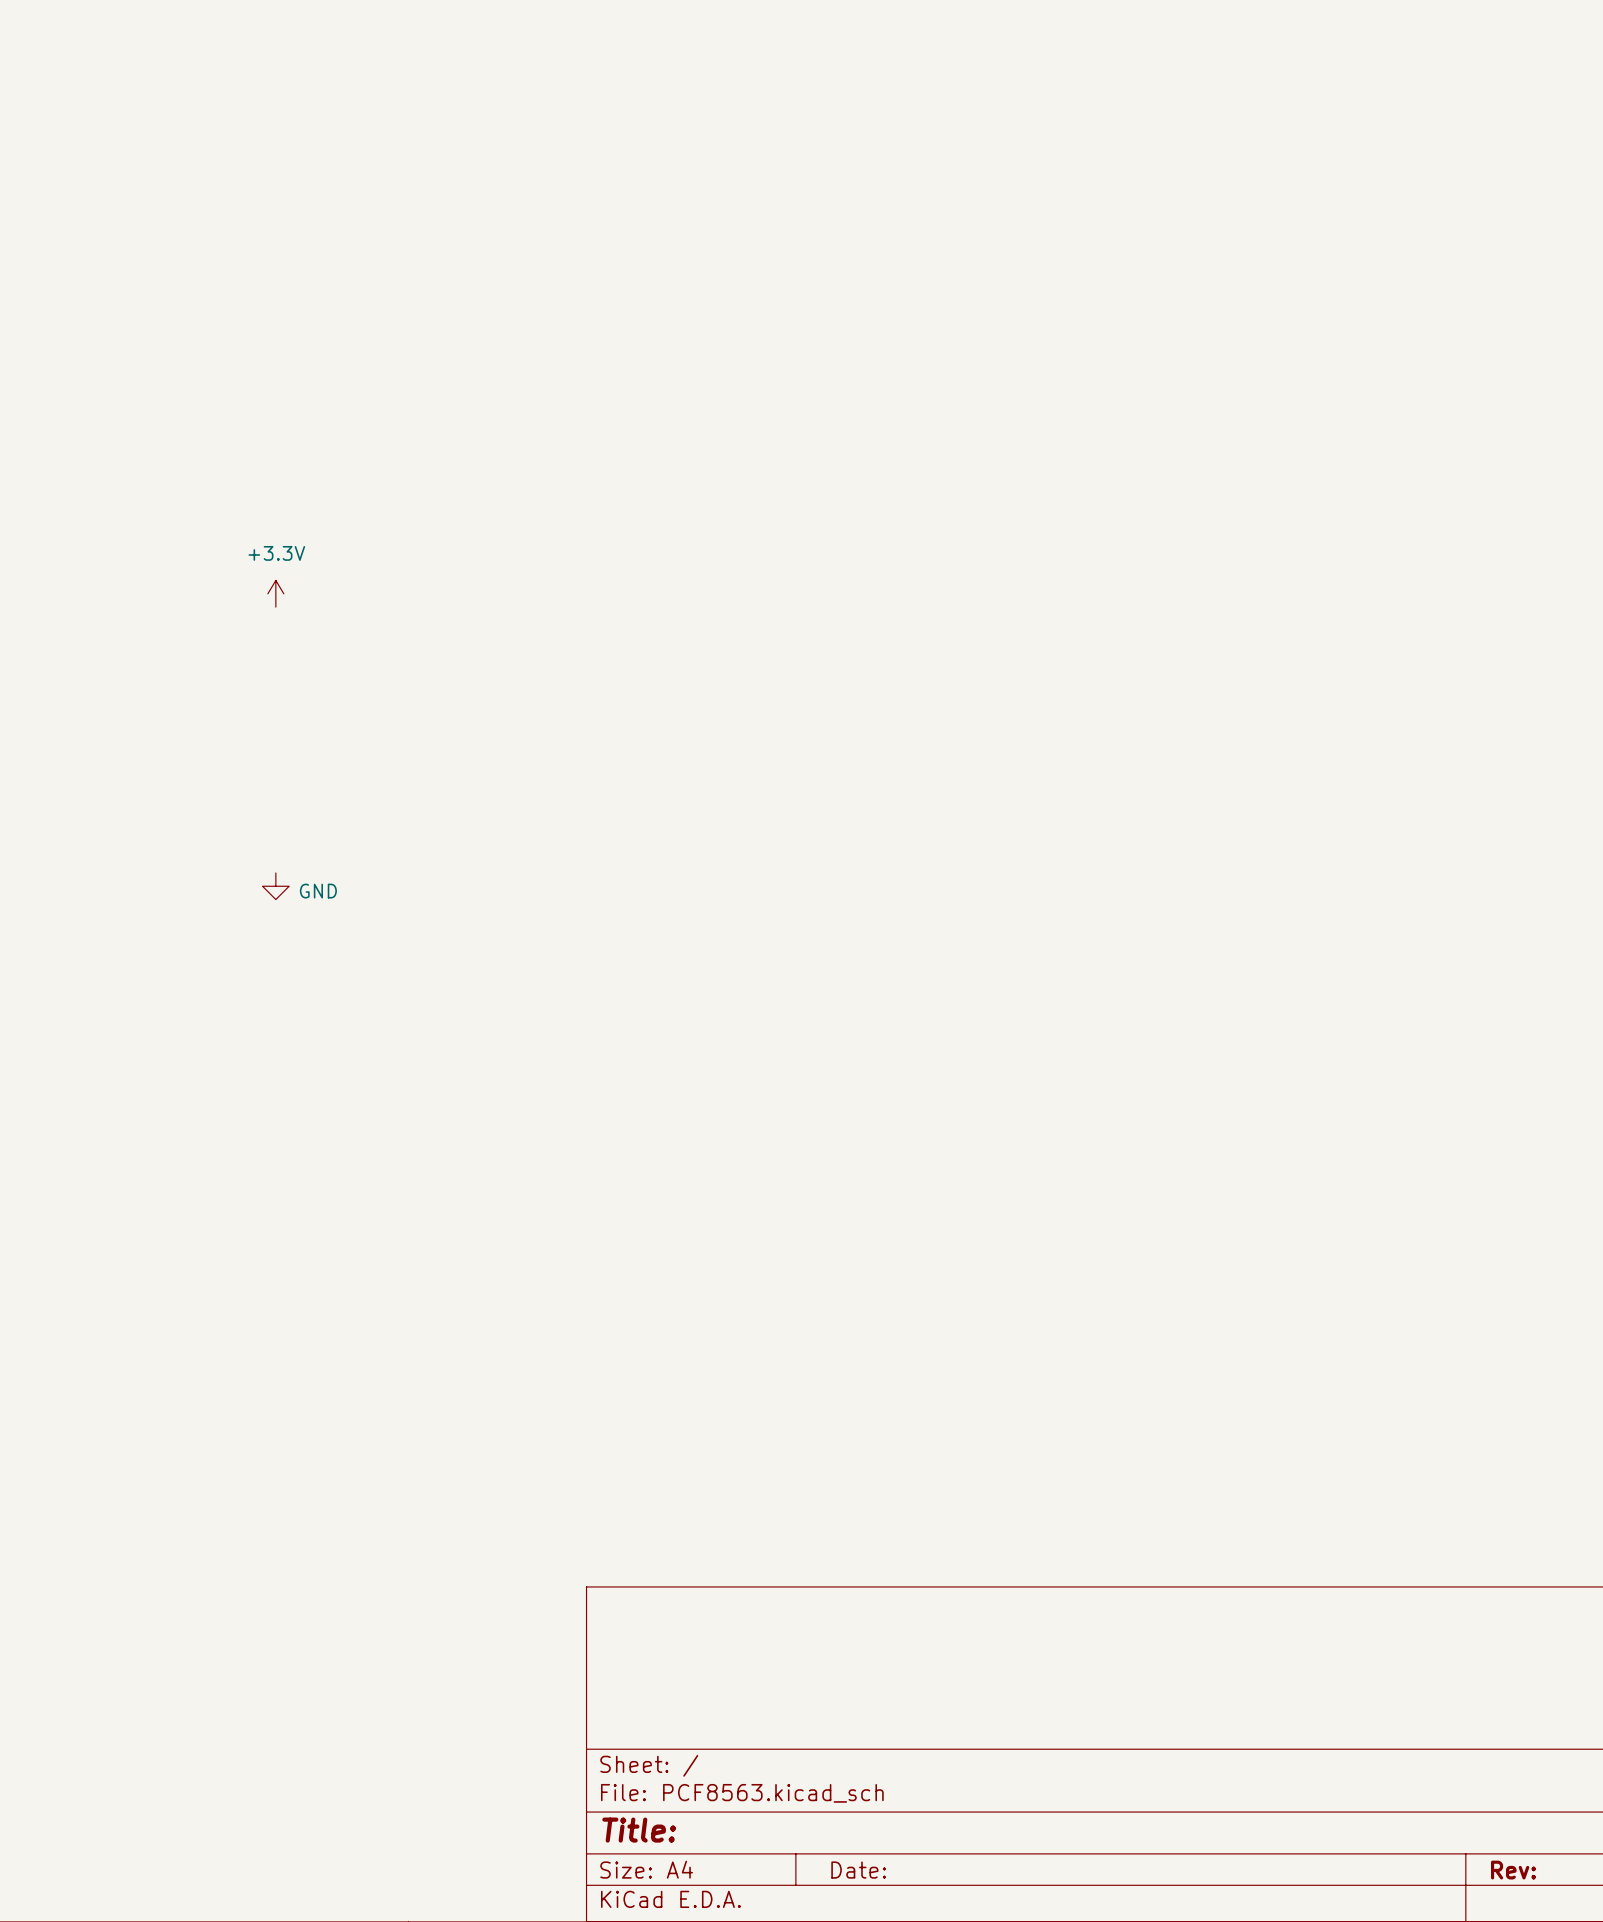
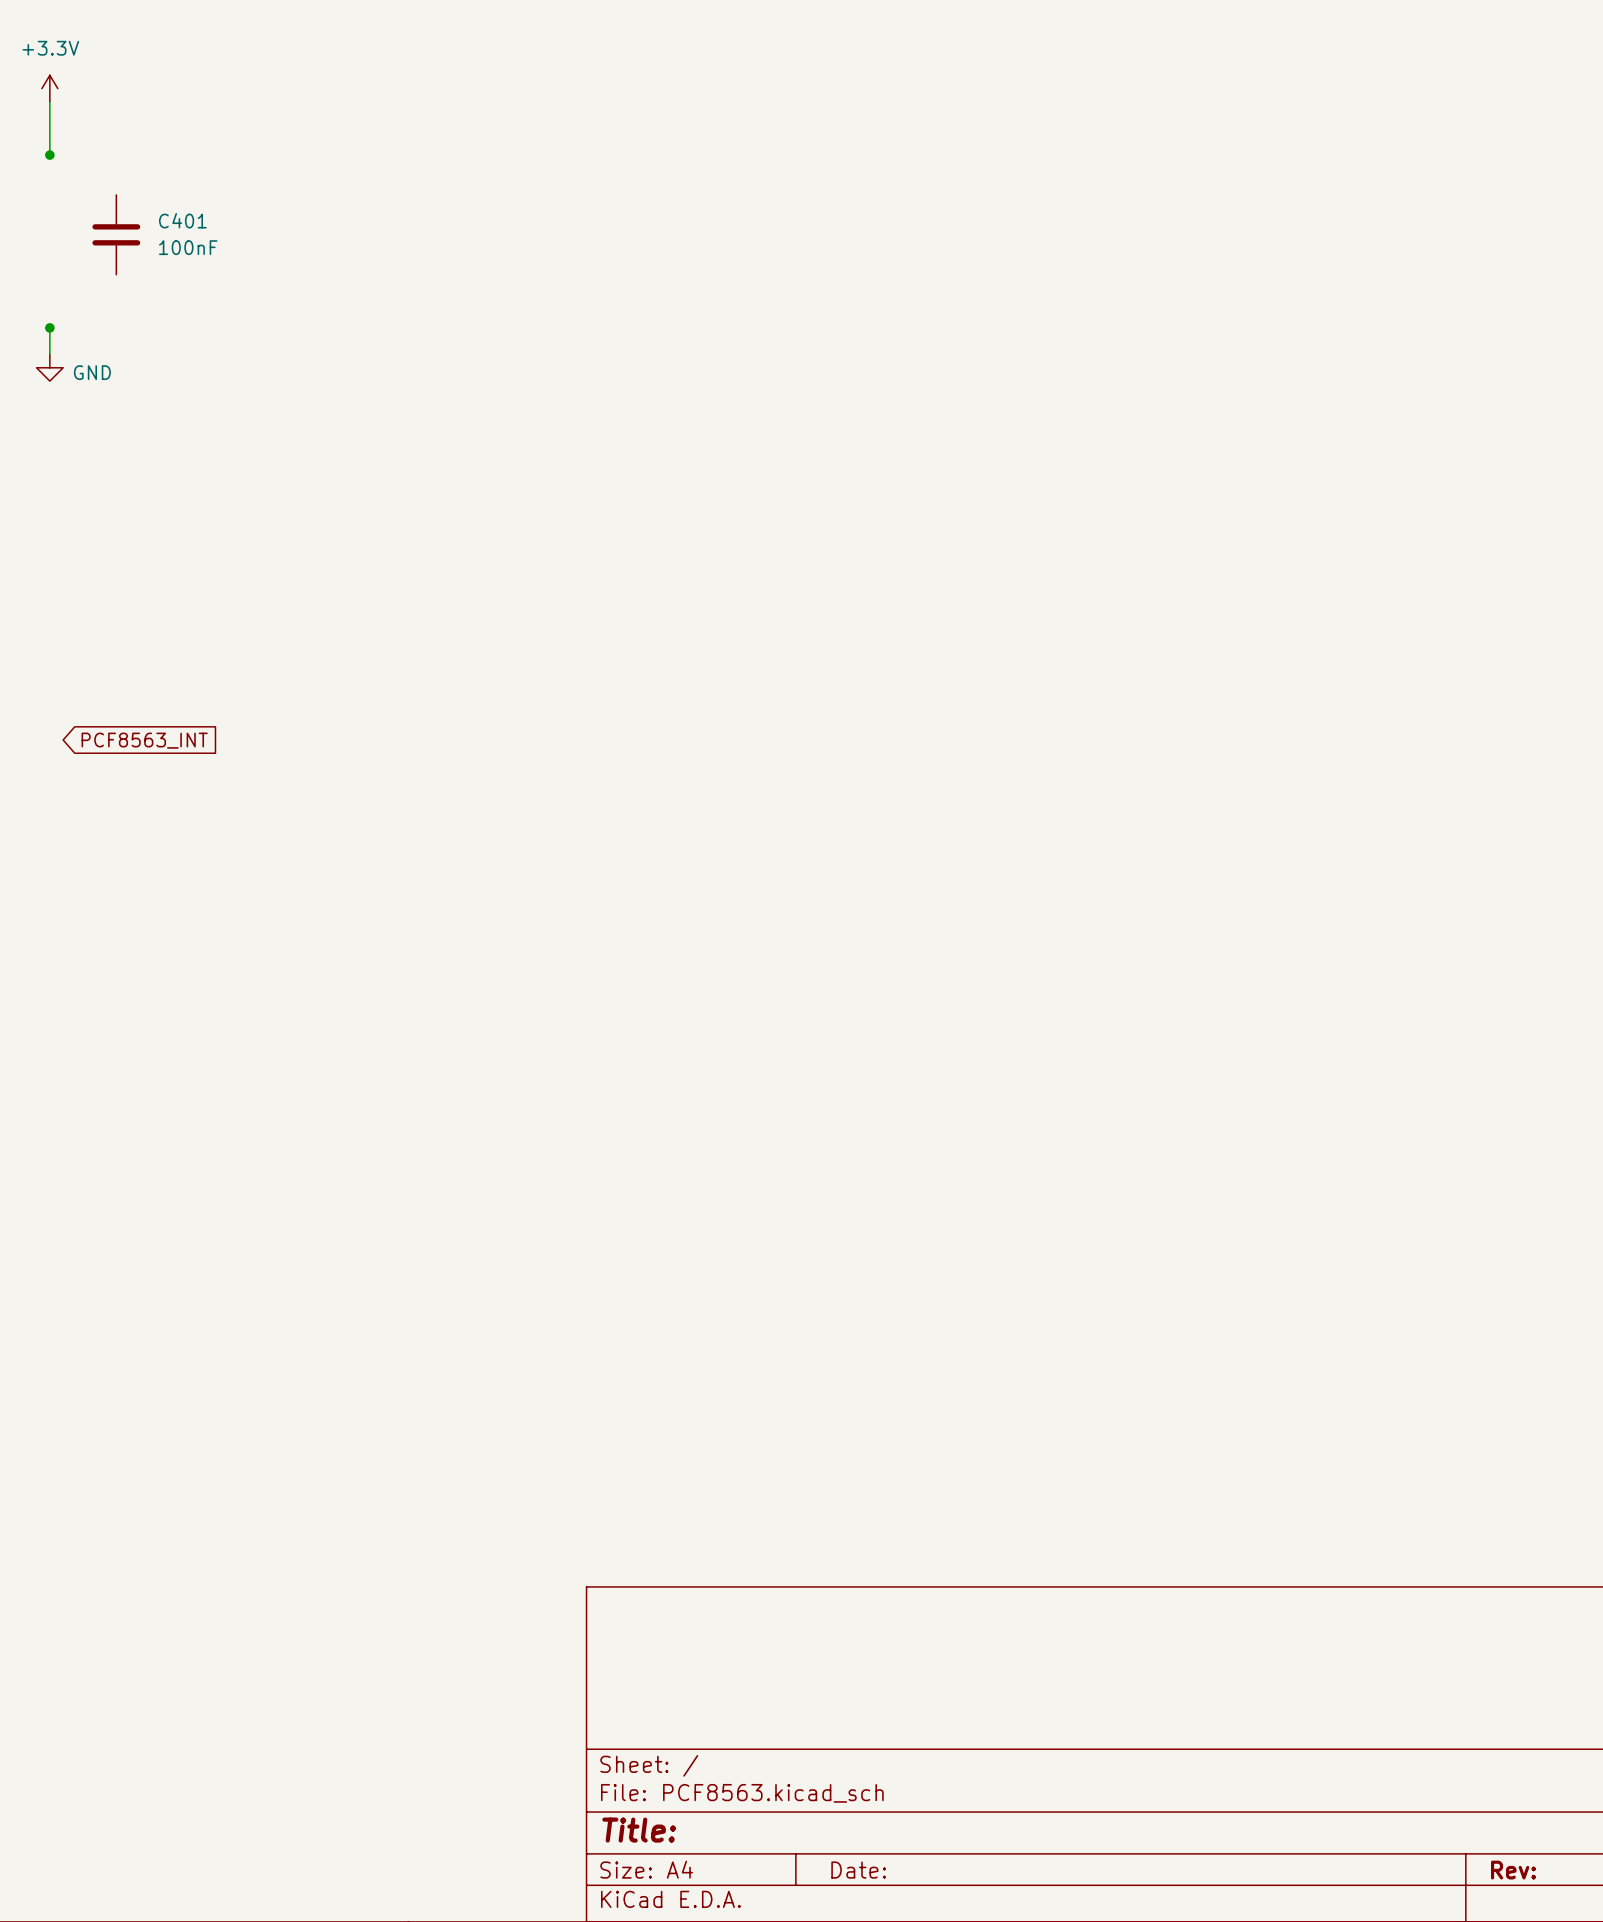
power symbol: none -> +3.3V (49, 88)
wire: none -> (49, 101) (49, 155)
junction: none -> (49, 155)
C401: none -> 100nF (116, 234)
wire: none -> (49, 327) (49, 354)
junction: none -> (49, 327)
power symbol: none -> GND (49, 367)
power symbol: +3.3V (275, 593) -> none
global label: none -> PCF8563_INT (144, 740)
power symbol: GND (275, 886) -> none

